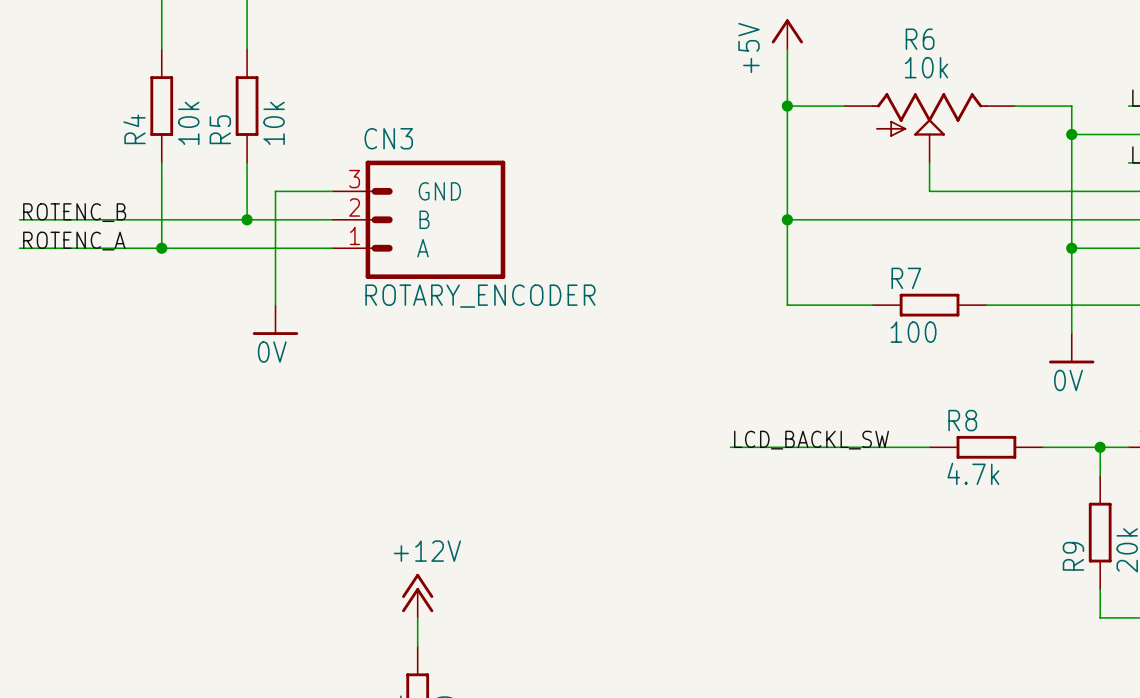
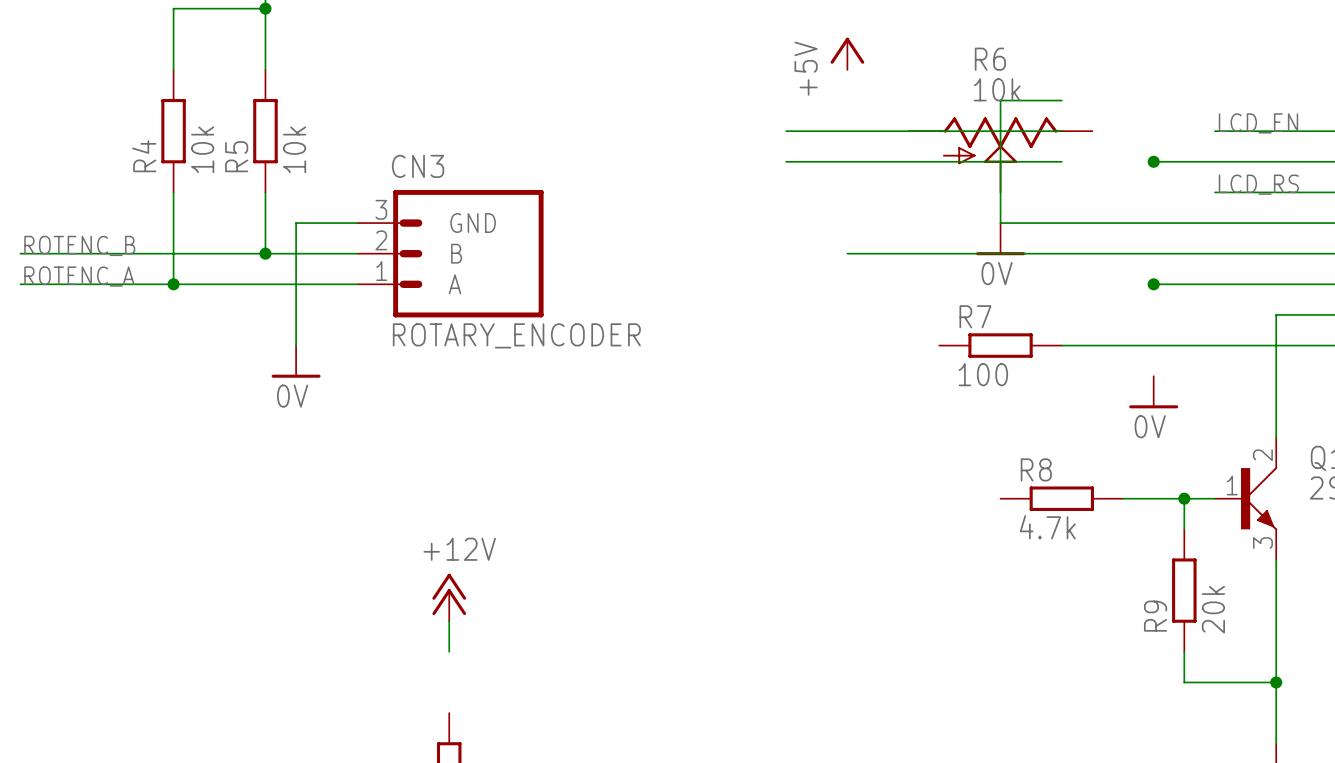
wire: (787, 49) (787, 305) (872, 305) -> none
wire: none -> (1061, 100) (1000, 100) (1000, 192)
wire: none -> (786, 131) (847, 131)
junction: (787, 106) -> none
wire: none -> (908, 131) (1061, 131)
wire: (1014, 106) (1071, 106) (1071, 333) -> none
wire: none -> (786, 161) (1061, 161)
power symbol: none -> 0V (1000, 239)
junction: (787, 219) -> none
label: LCD_BACKL_SW (811, 440) -> none
wire: (730, 447) (929, 447) -> none
power symbol position: +12V (417, 595) -> +12V (449, 597)
wire: (417, 617) (417, 646) -> (449, 621) (449, 651)

